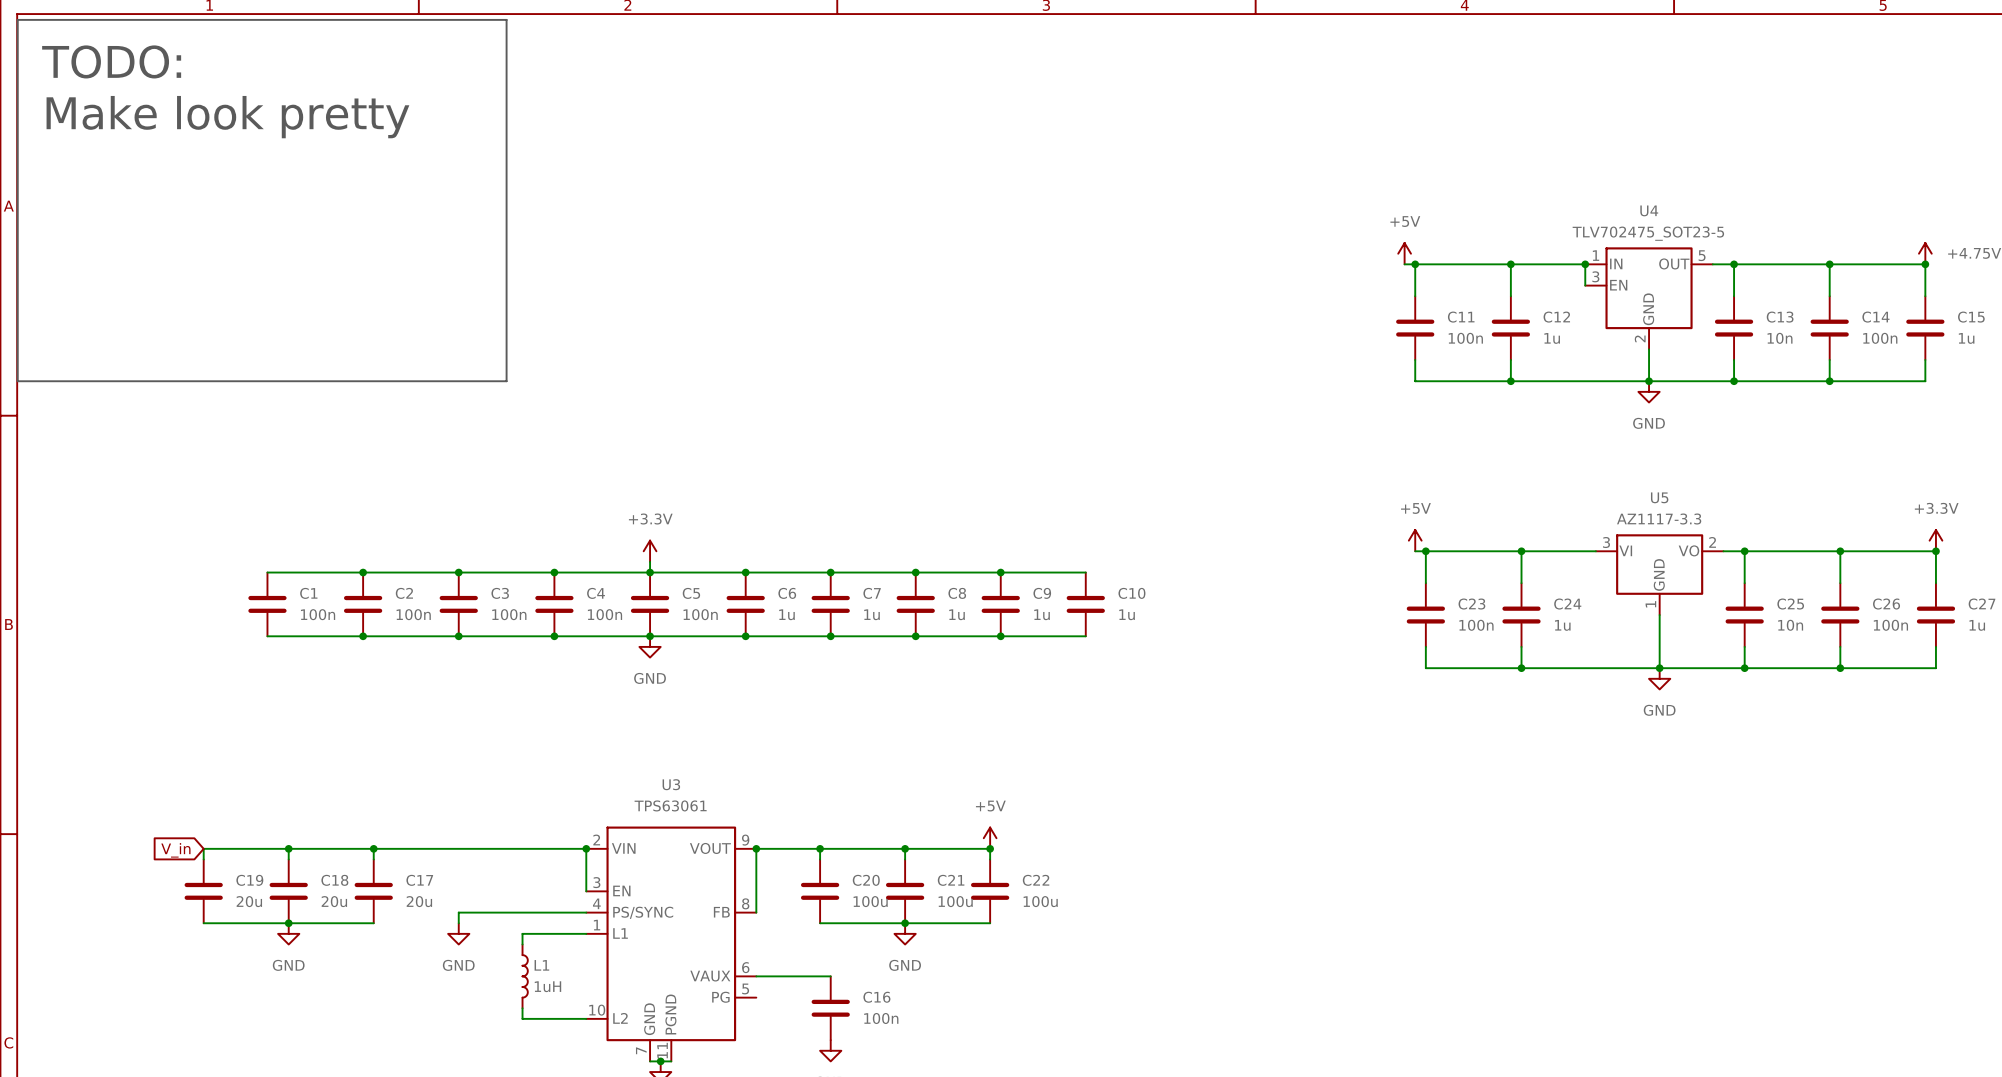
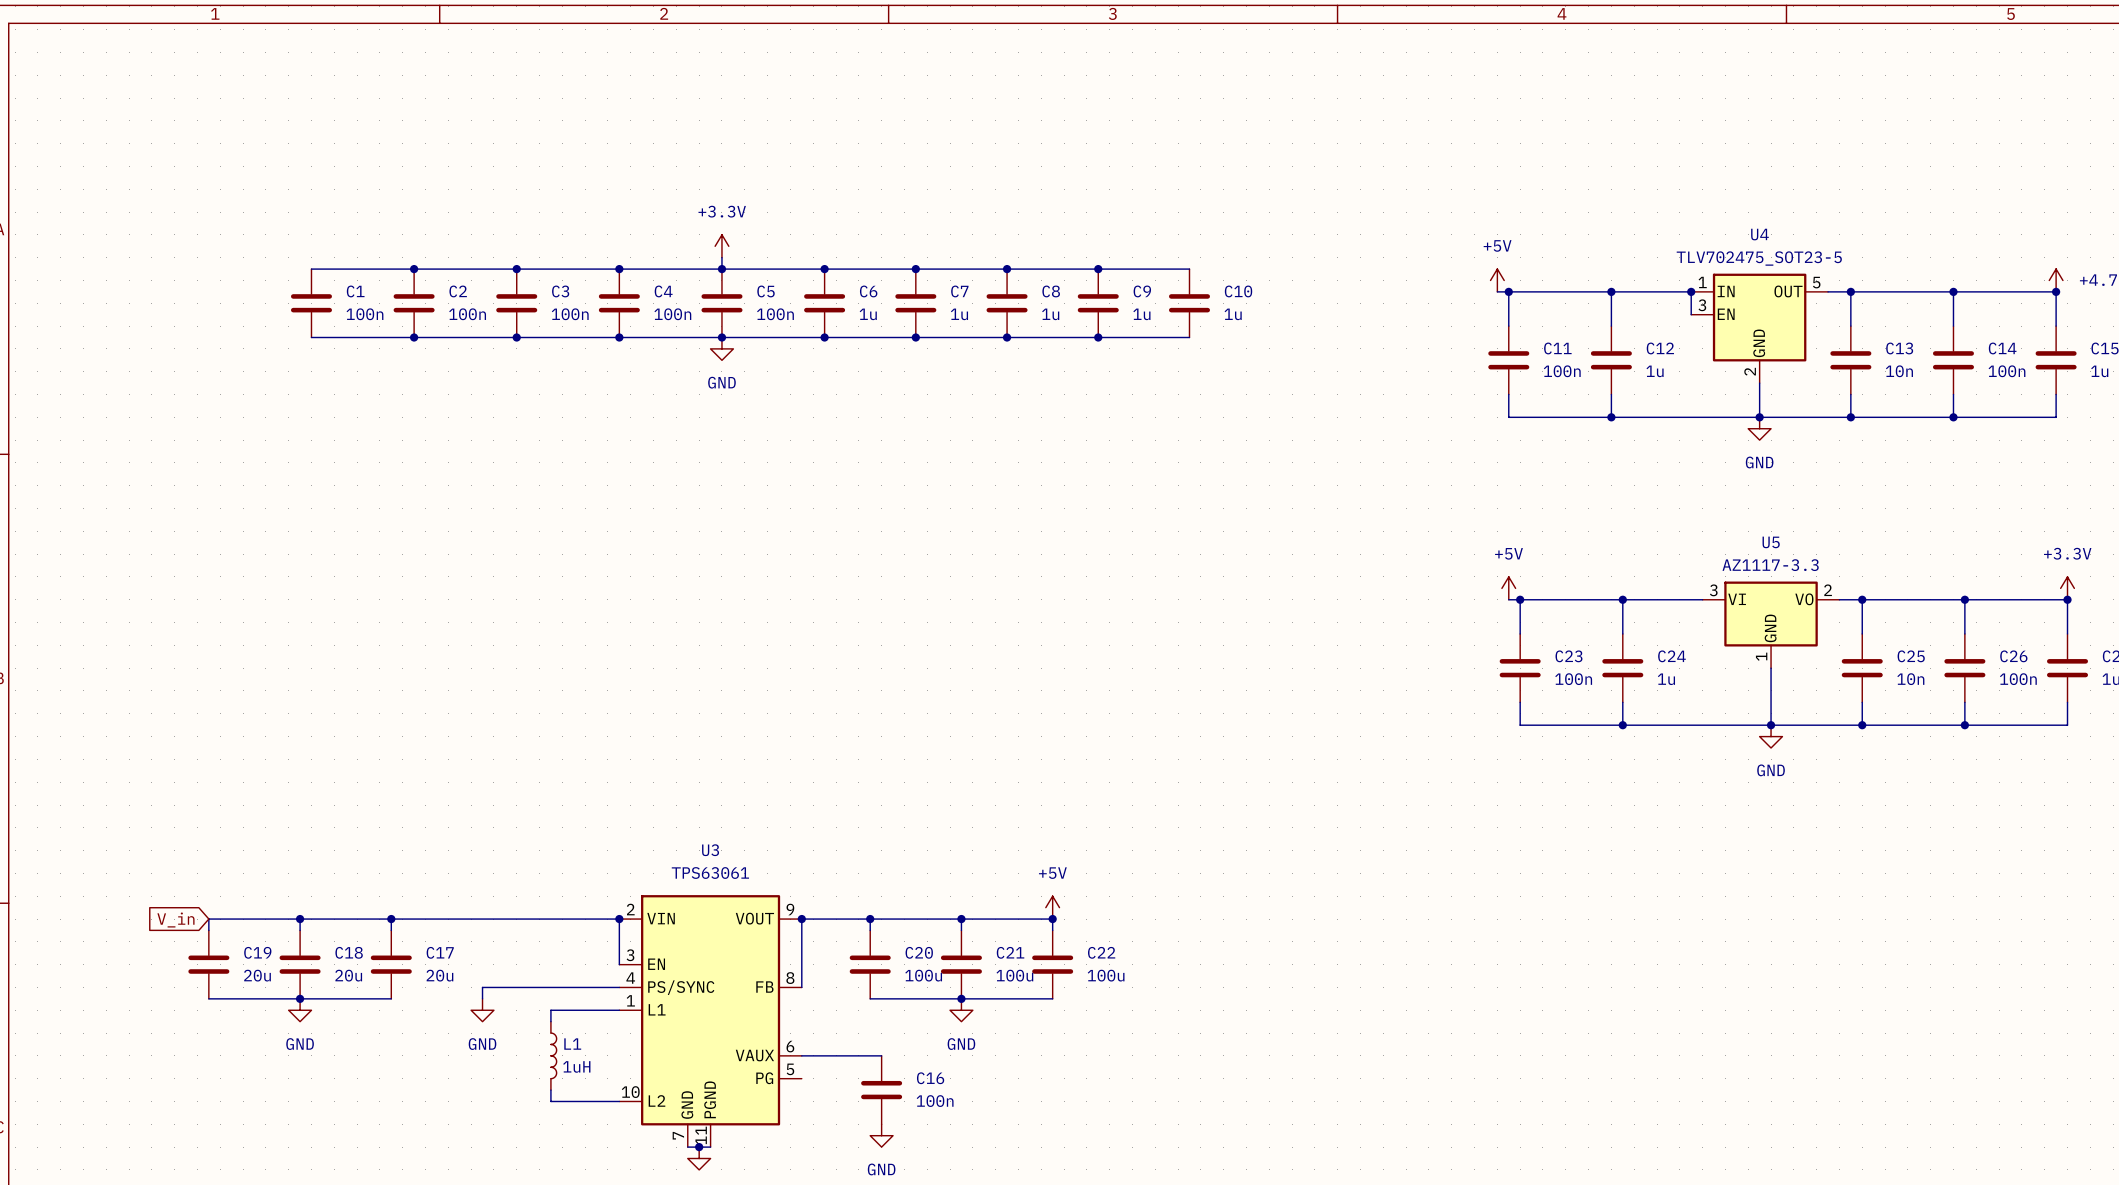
line: (17, 19) (506, 19) (506, 381) (17, 381) (17, 19) -> none
text: TODO: (111, 61) -> none
text: Make look pretty (227, 117) -> none
power symbol: none -> +3.3V (721, 246)
wire: none -> (721, 257) (721, 269)
wire: none -> (311, 269) (1189, 269)
junction: none -> (414, 269)
junction: none -> (516, 269)
junction: none -> (619, 269)
junction: none -> (721, 269)
junction: none -> (824, 269)
junction: none -> (915, 269)
junction: none -> (1007, 269)
junction: none -> (1098, 269)
wire: none -> (311, 337) (1189, 337)
junction: none -> (414, 337)
junction: none -> (516, 337)
junction: none -> (619, 337)
junction: none -> (721, 337)
junction: none -> (824, 337)
junction: none -> (915, 337)
junction: none -> (1007, 337)
junction: none -> (1098, 337)
power symbol: none -> GND (721, 348)
power symbol: +3.3V (650, 551) -> none
wire: (650, 561) (650, 572) -> none
wire: (267, 572) (1085, 572) -> none
junction: (363, 572) -> none
junction: (458, 572) -> none
junction: (554, 572) -> none
junction: (650, 572) -> none
junction: (745, 572) -> none
junction: (830, 572) -> none
junction: (915, 572) -> none
junction: (1000, 572) -> none
C1 position: (267, 604) -> (311, 303)
C2 position: (363, 604) -> (414, 303)
C3 position: (458, 604) -> (516, 303)
C4 position: (554, 604) -> (619, 303)
C5 position: (650, 604) -> (721, 303)
C6 position: (745, 604) -> (824, 303)
C7 position: (830, 604) -> (915, 303)
C8 position: (915, 604) -> (1007, 303)
C9 position: (1000, 604) -> (1098, 303)
C10 position: (1085, 604) -> (1189, 303)
wire: (267, 636) (1085, 636) -> none
junction: (363, 636) -> none
junction: (458, 636) -> none
junction: (554, 636) -> none
junction: (650, 636) -> none
junction: (745, 636) -> none
junction: (830, 636) -> none
junction: (915, 636) -> none
junction: (1000, 636) -> none
power symbol: GND (650, 646) -> none

